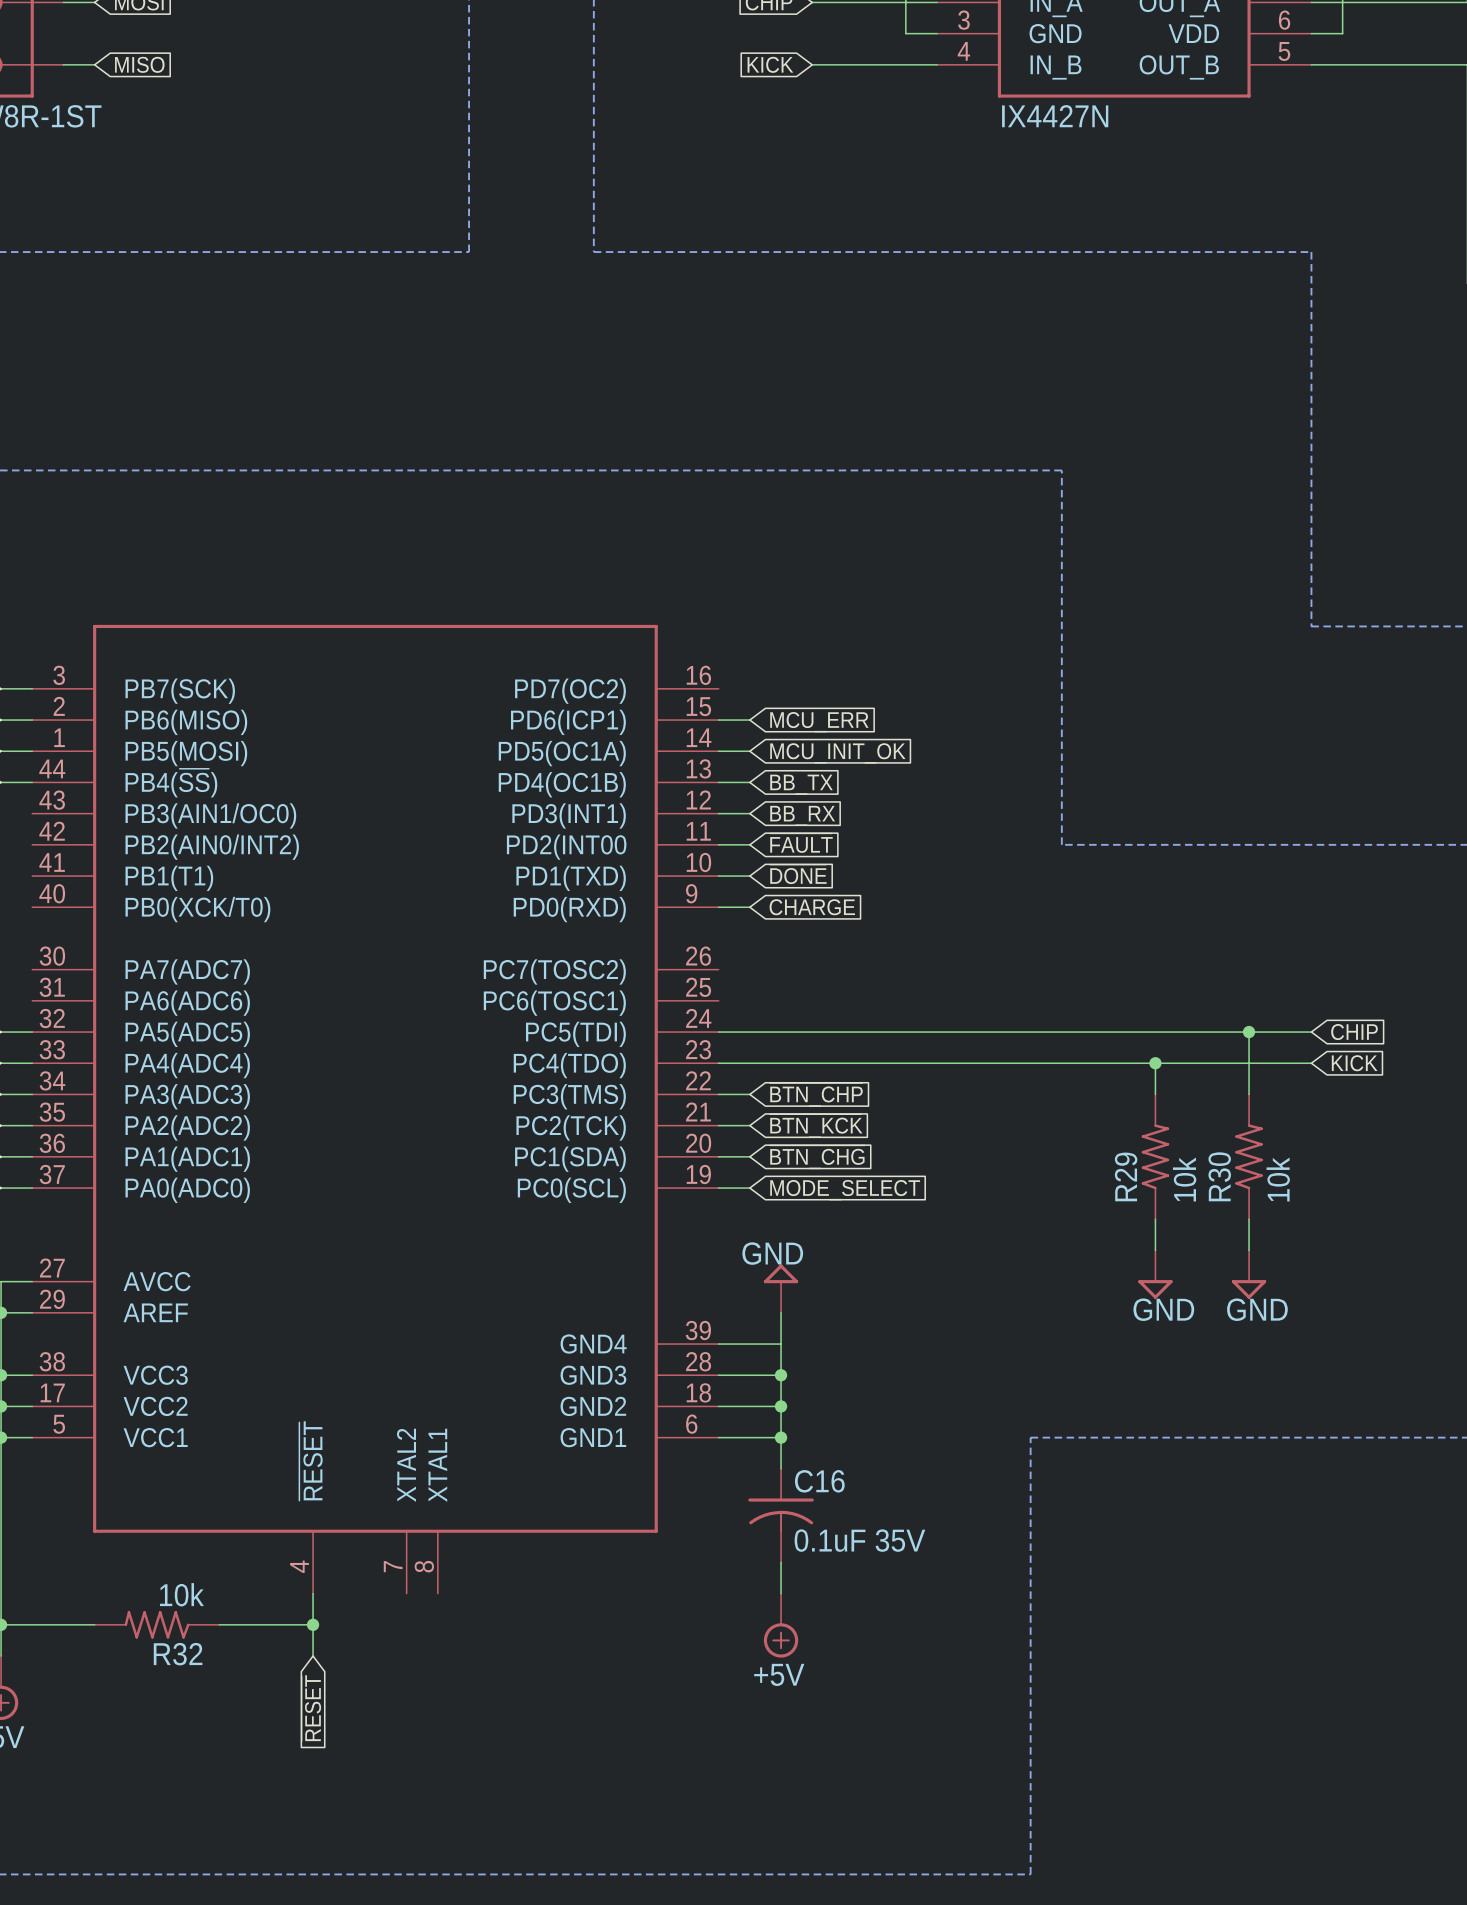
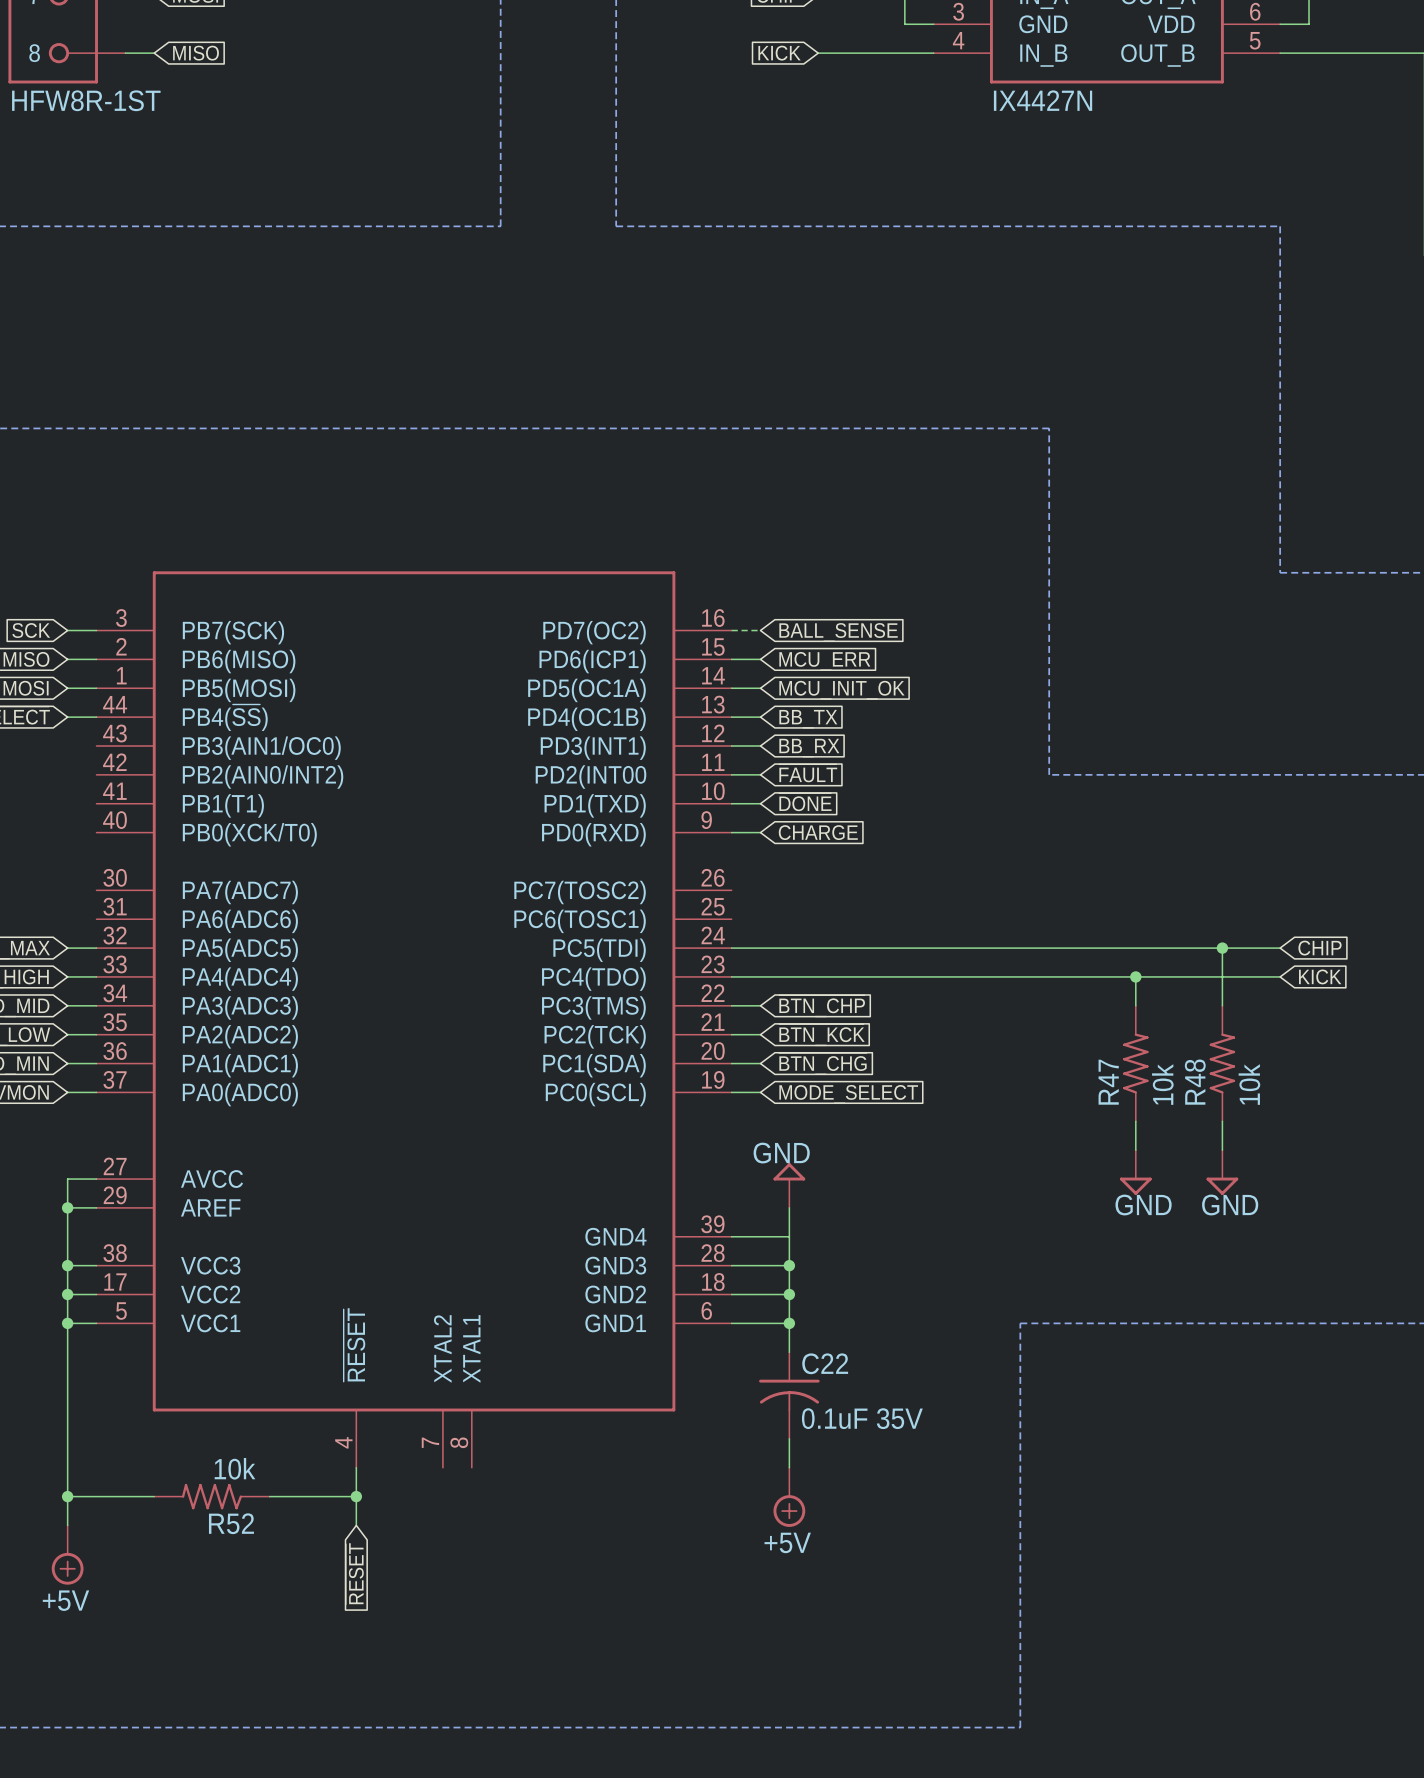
wire: none -> (731, 630) (760, 630)
global label: none -> BALL_SENSE (838, 632)
R29 name: R29 (1126, 1176) -> R47 (1108, 1082)
R30 name: R30 (1219, 1176) -> R48 (1195, 1082)
C16 name: C16 (819, 1481) -> C22 (825, 1363)
R32 name: R32 (178, 1654) -> R52 (231, 1523)

